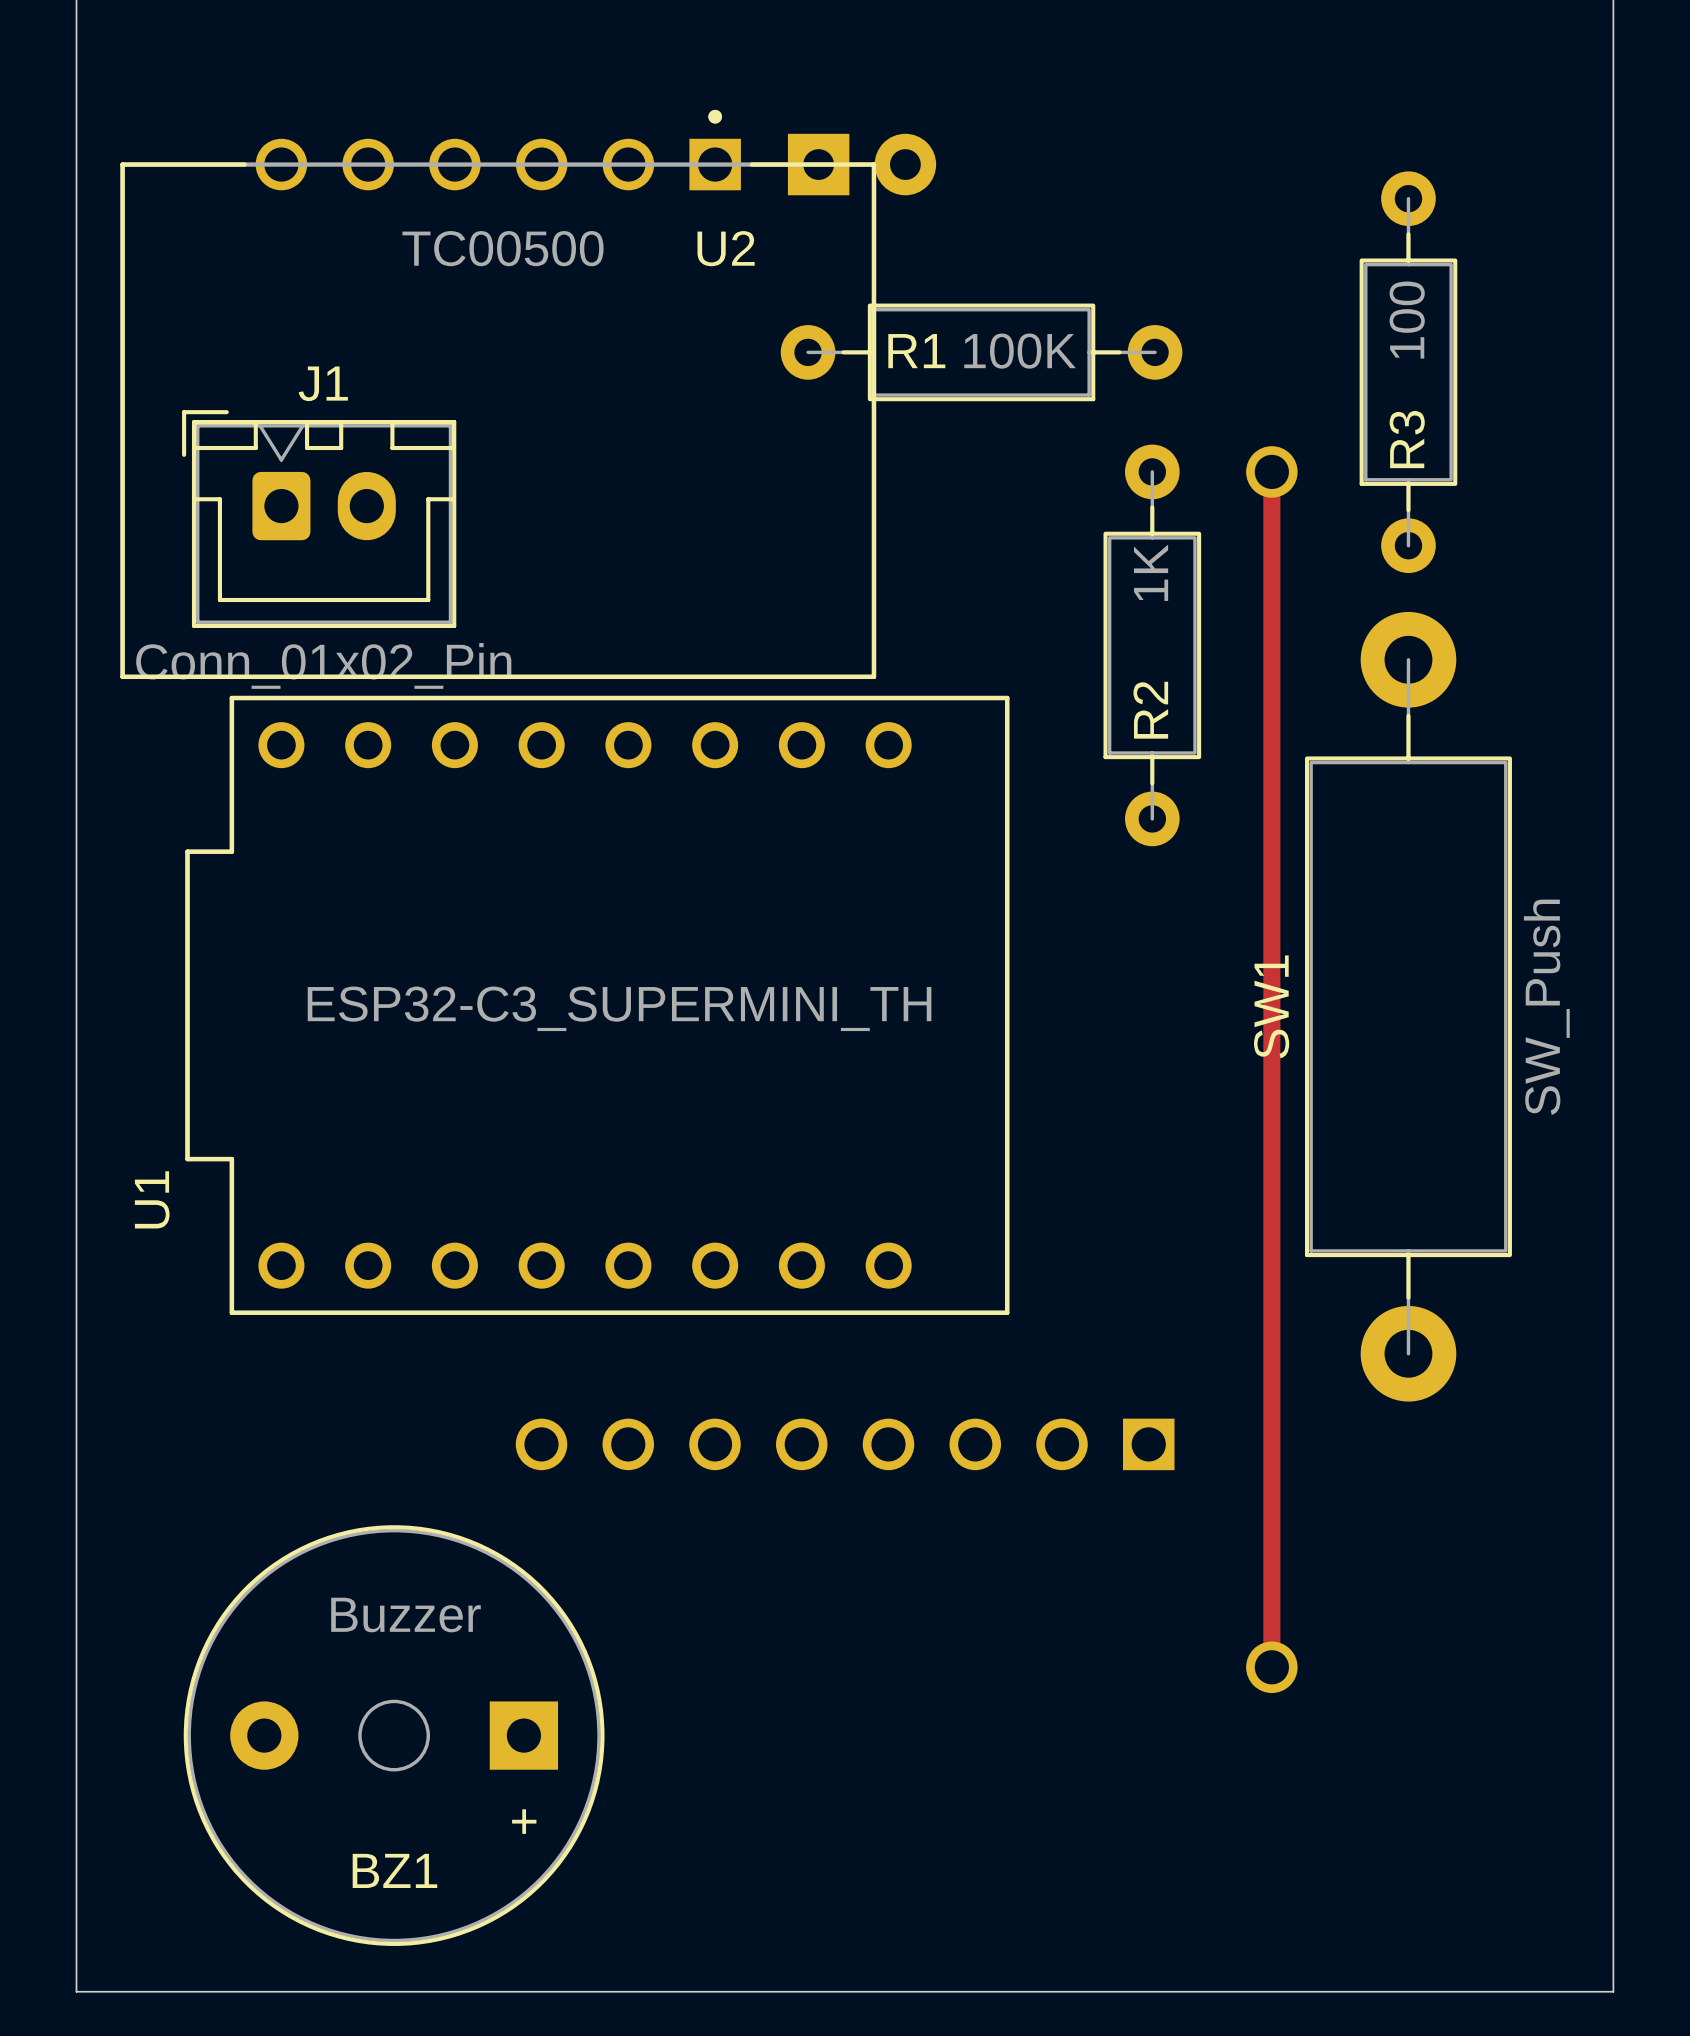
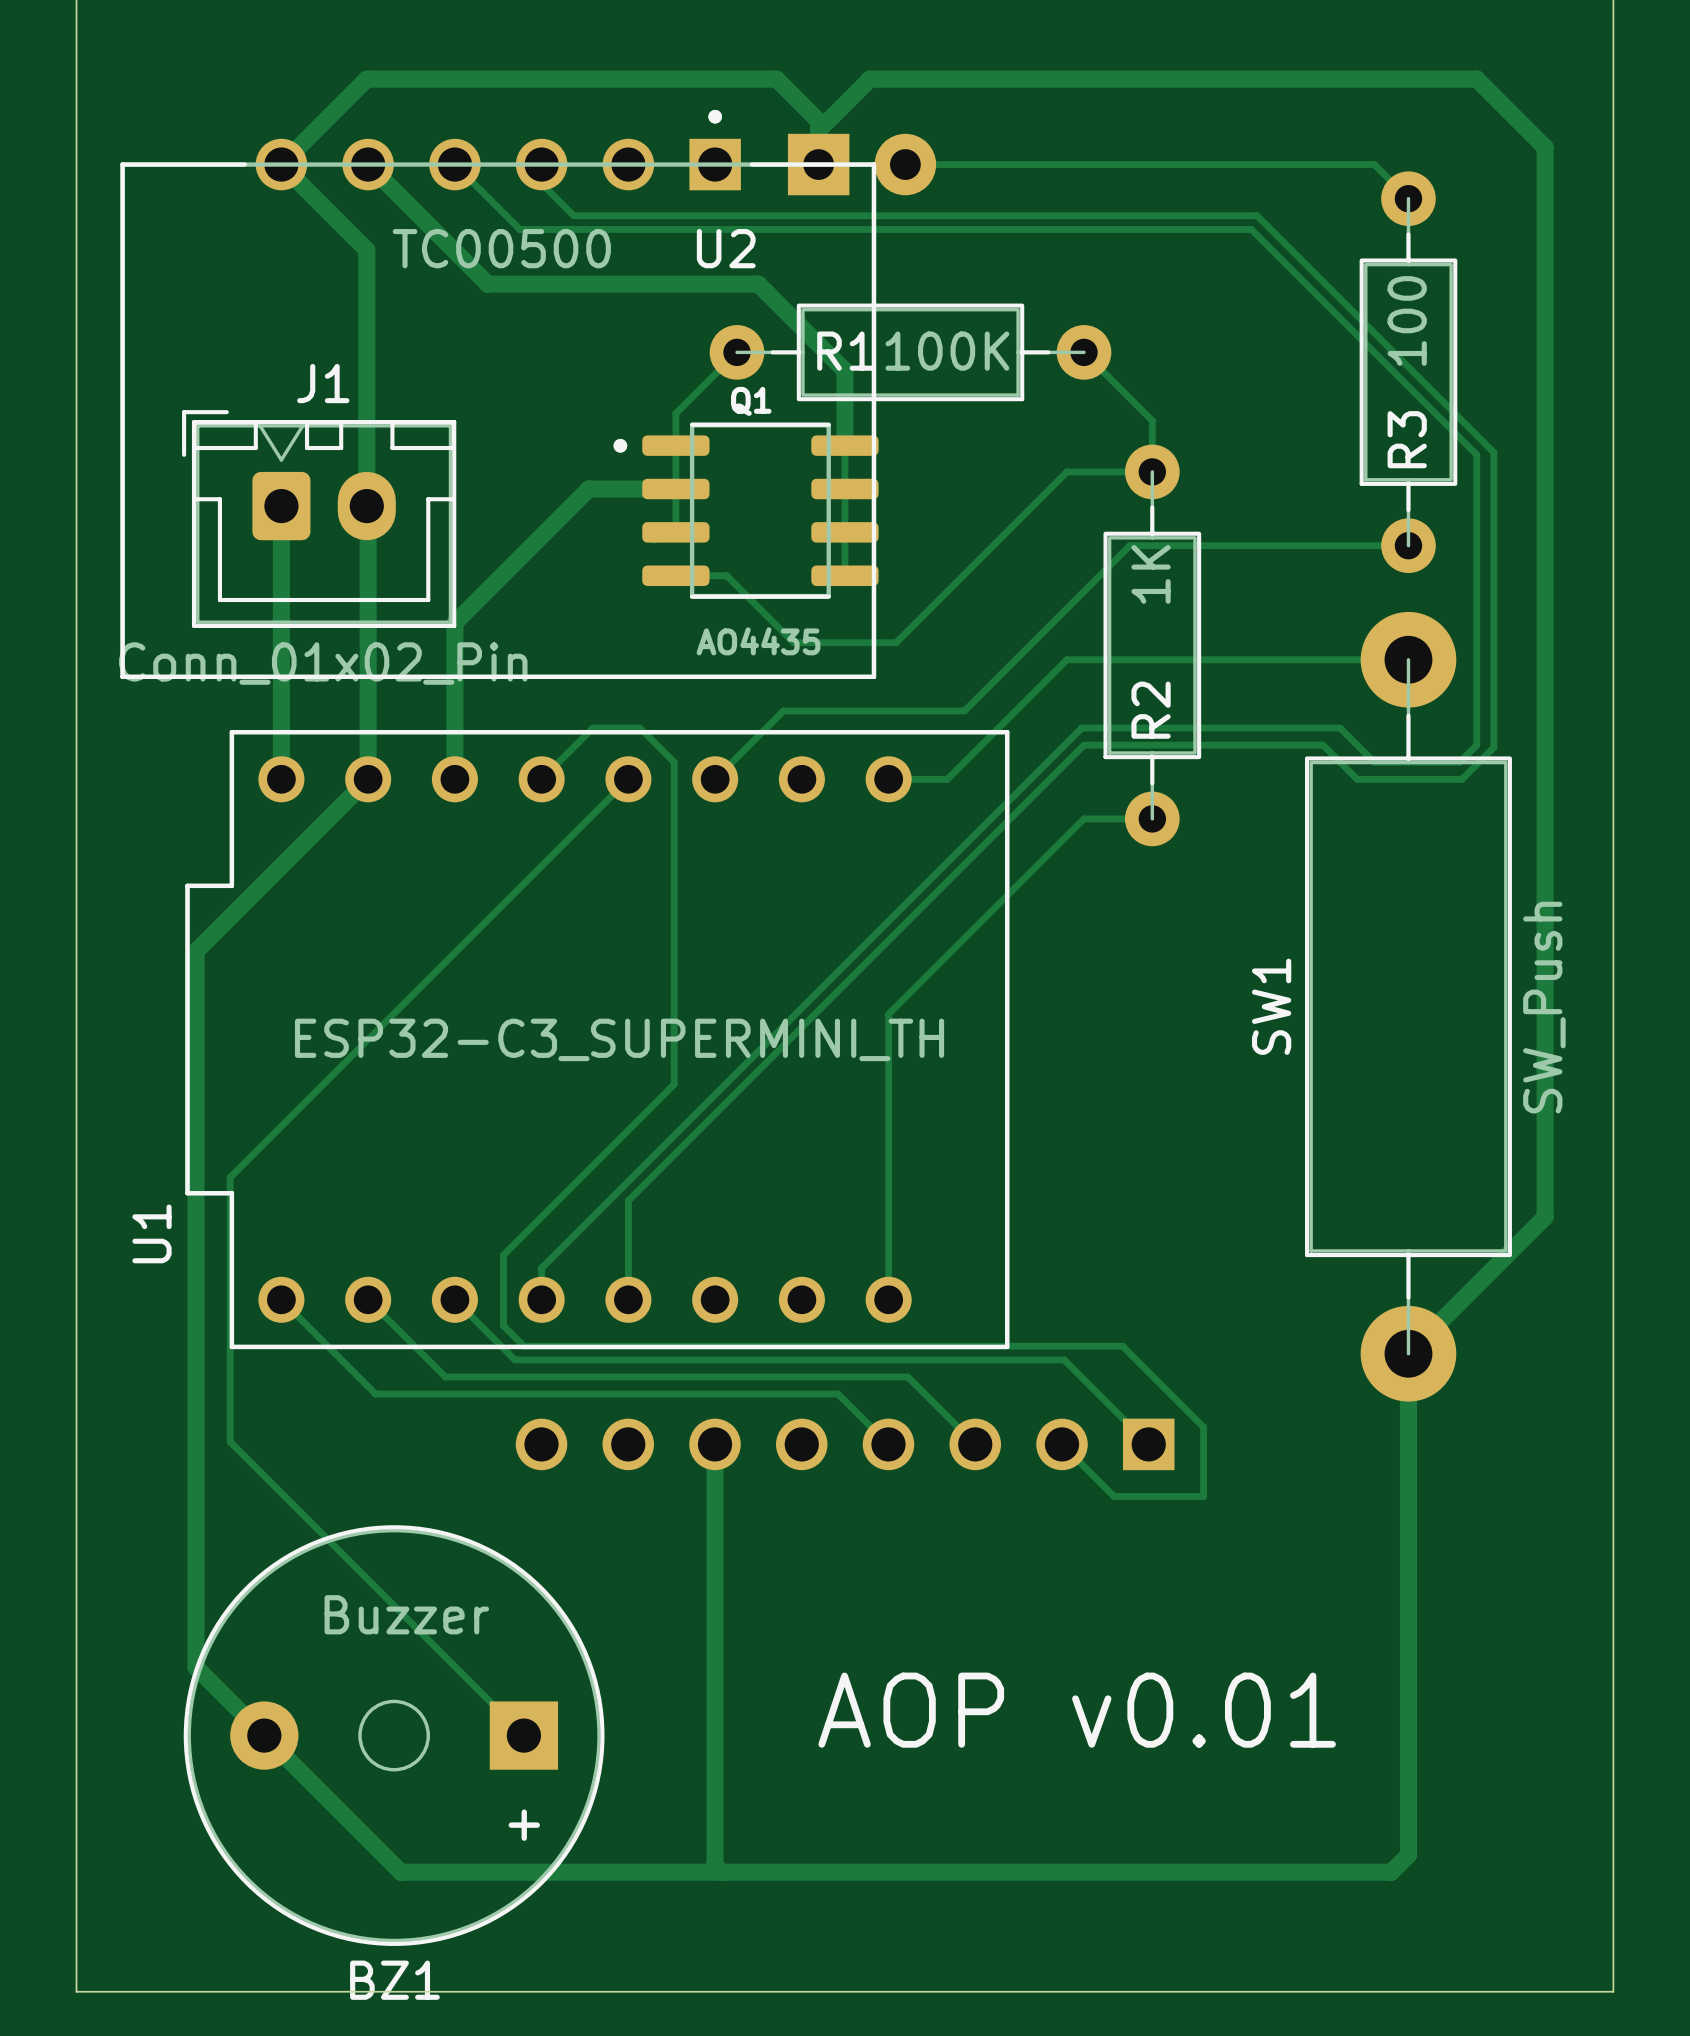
track: none -> (818, 130) (869, 79) (1476, 79) (1545, 147) (1545, 1217) (1408, 1353) (1408, 1855) (1391, 1872) (400, 1872) (196, 1667) (196, 951) (368, 779) (366, 249) (281, 164) (366, 79) (776, 79) (818, 121) (818, 164)
track: none -> (368, 164) (487, 284) (758, 284) (844, 370) (844, 575)
track: none -> (454, 164) (519, 229) (1251, 229) (1476, 454) (1476, 745) (1459, 762) (1374, 762) (1340, 728) (1081, 728) (541, 1268) (541, 1299)
track: none -> (541, 164) (541, 183) (573, 215) (1257, 215) (1493, 452) (1493, 747) (1461, 779) (1357, 779) (1323, 745) (1084, 745) (628, 1200) (628, 1299)
track: none -> (905, 164) (1374, 164) (1391, 181)
track: none -> (737, 352) (675, 413) (675, 532) (662, 532) (654, 540)
R1 position: (981, 352) -> (910, 352)
track: none -> (1084, 352) (1152, 420) (1152, 471) (1066, 471) (896, 642) (793, 642) (726, 575) (675, 575)
track: (1271, 471) (1271, 1667) -> none
part: (1271, 471) -> none
track: none -> (675, 489) (588, 489) (454, 622) (454, 779)
track: none -> (281, 506) (281, 779)
Q1: none -> AO4435 (746, 510)
track: none -> (1408, 545) (1129, 545) (964, 710) (783, 710) (715, 779)
track: none -> (1408, 659) (1066, 659) (947, 779) (888, 779)
track: none -> (541, 779) (592, 728) (640, 728) (674, 762) (674, 1084) (503, 1255) (503, 1325) (523, 1346) (1122, 1346) (1203, 1427) (1203, 1496) (1114, 1496) (1062, 1444)
track: none -> (628, 779) (230, 1177) (230, 1441) (523, 1735)
track: none -> (1152, 818) (1084, 818) (888, 1014) (888, 1299)
U1 position: (597, 1005) -> (597, 1039)
track: none -> (281, 1299) (375, 1394) (838, 1394) (888, 1444)
track: none -> (368, 1299) (445, 1376) (907, 1376) (975, 1444)
track: none -> (454, 1299) (515, 1359) (1064, 1359) (1148, 1444)
track: none -> (715, 1444) (715, 1865) (721, 1872)
part: (1271, 1667) -> none
text: none -> AOP v0.01 (1077, 1710)
BZ1 name position: BZ1 (394, 1870) -> BZ1 (394, 1980)

